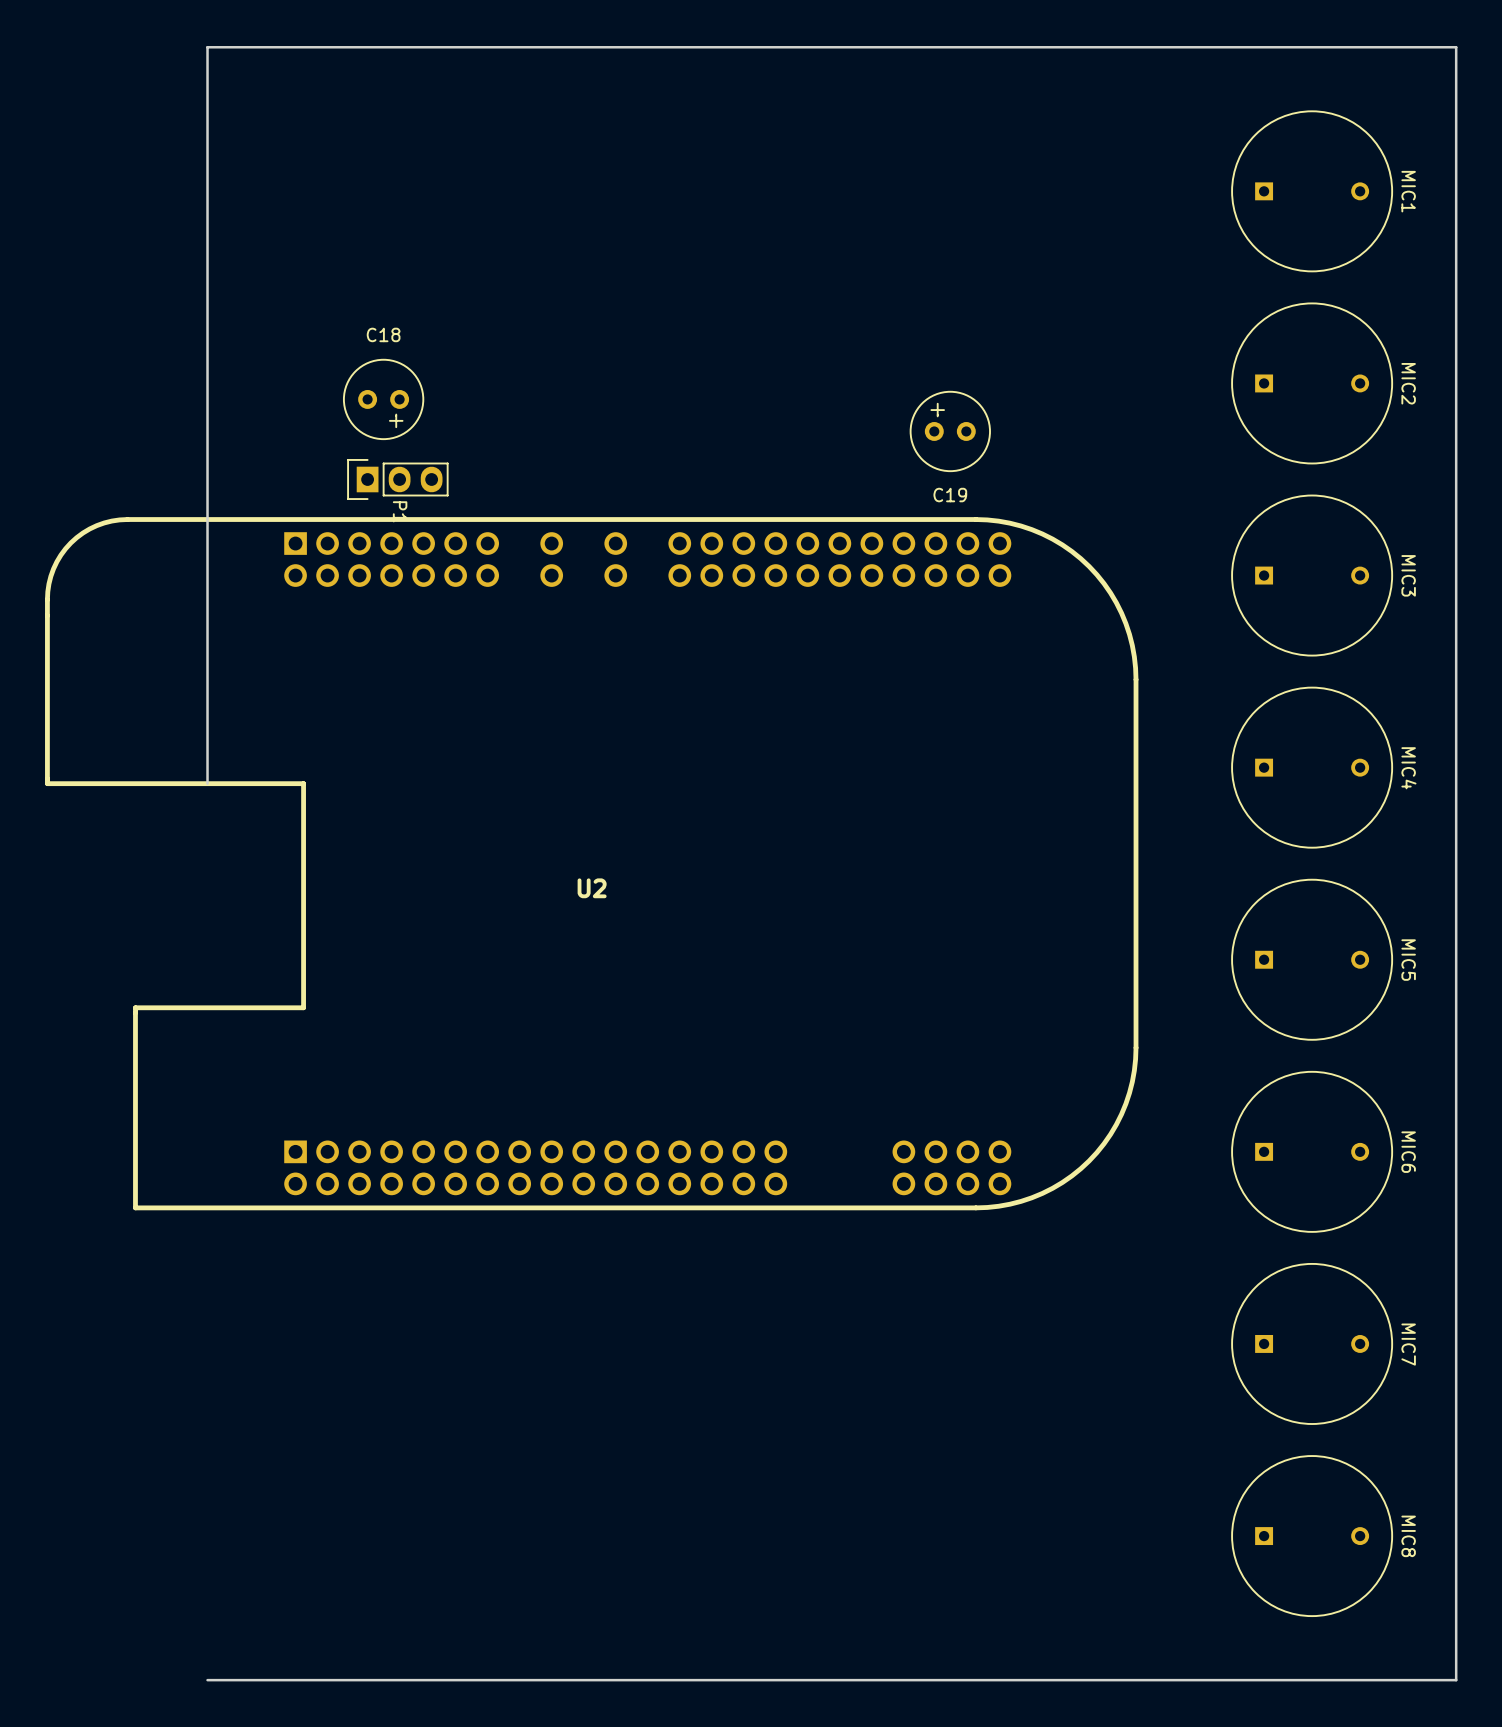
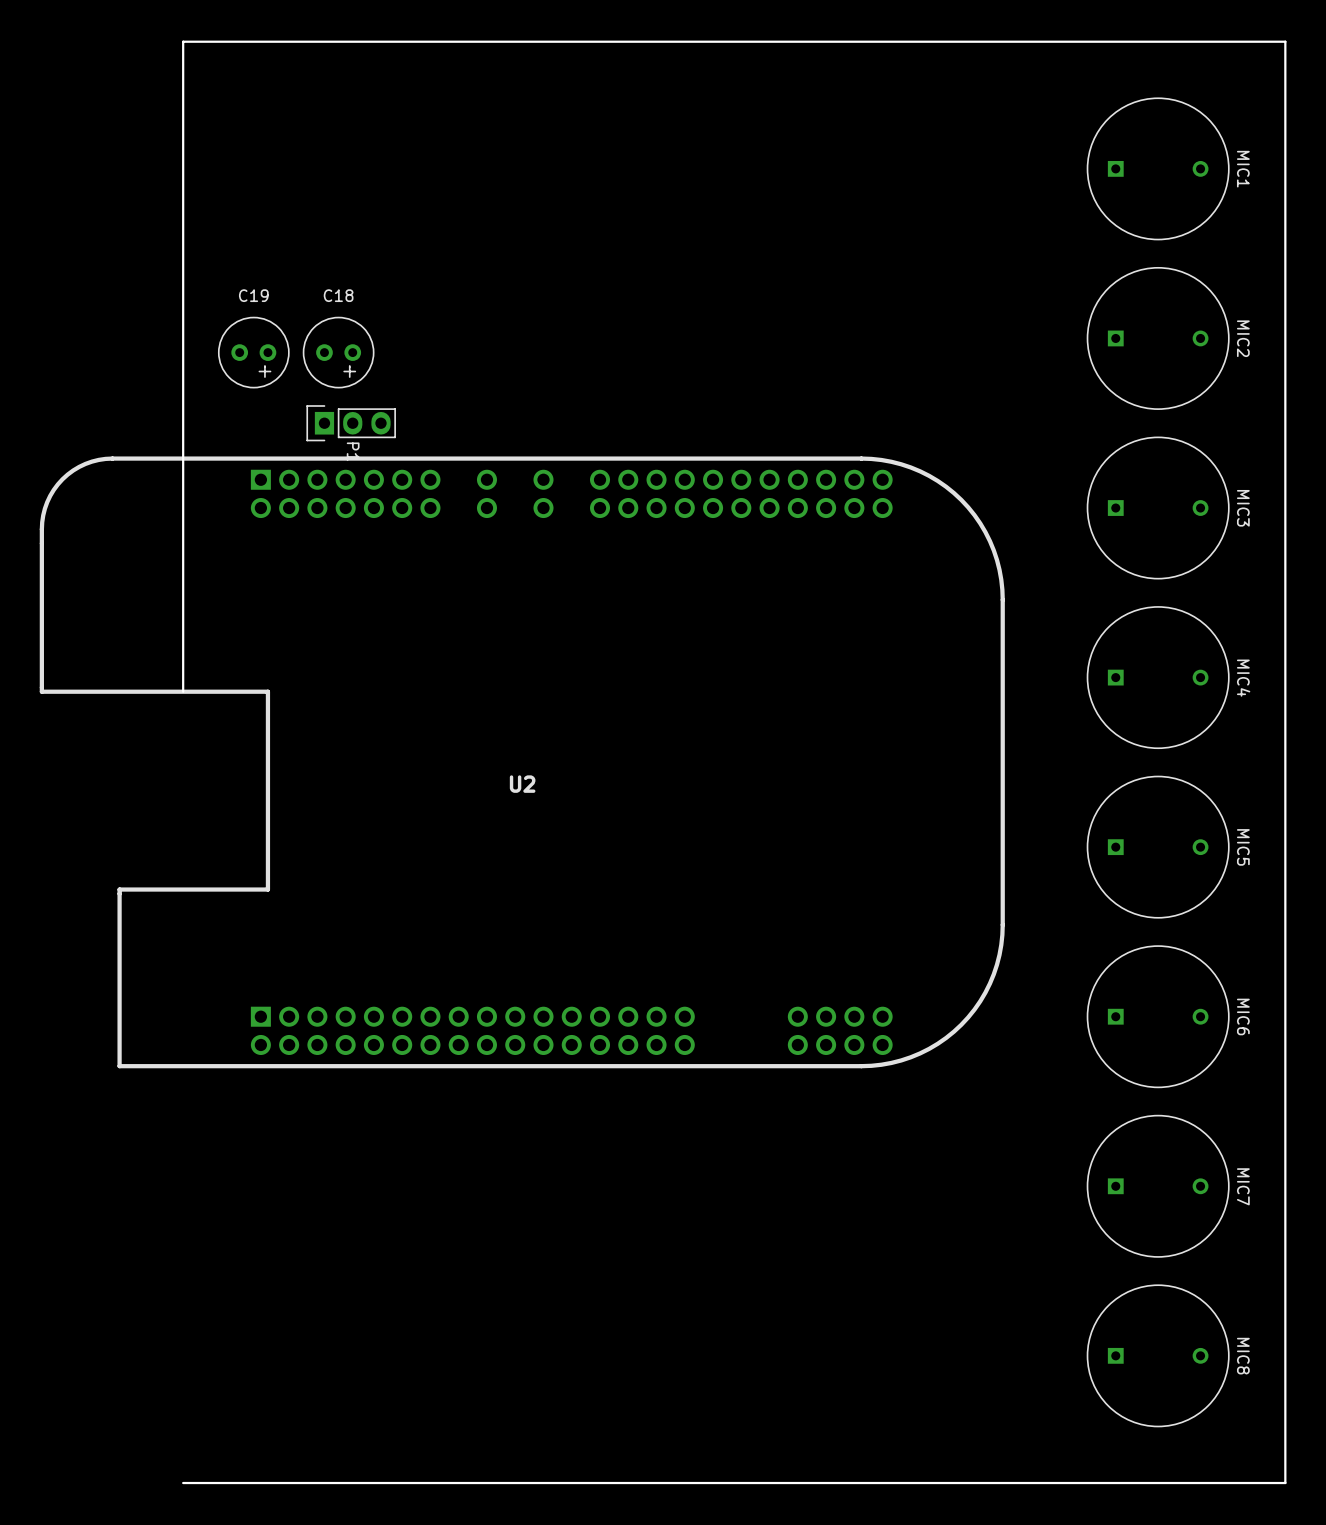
C19 rotation: 0° (950, 431) -> 180° (253, 352)
C19 position: (950, 431) -> (253, 352)

